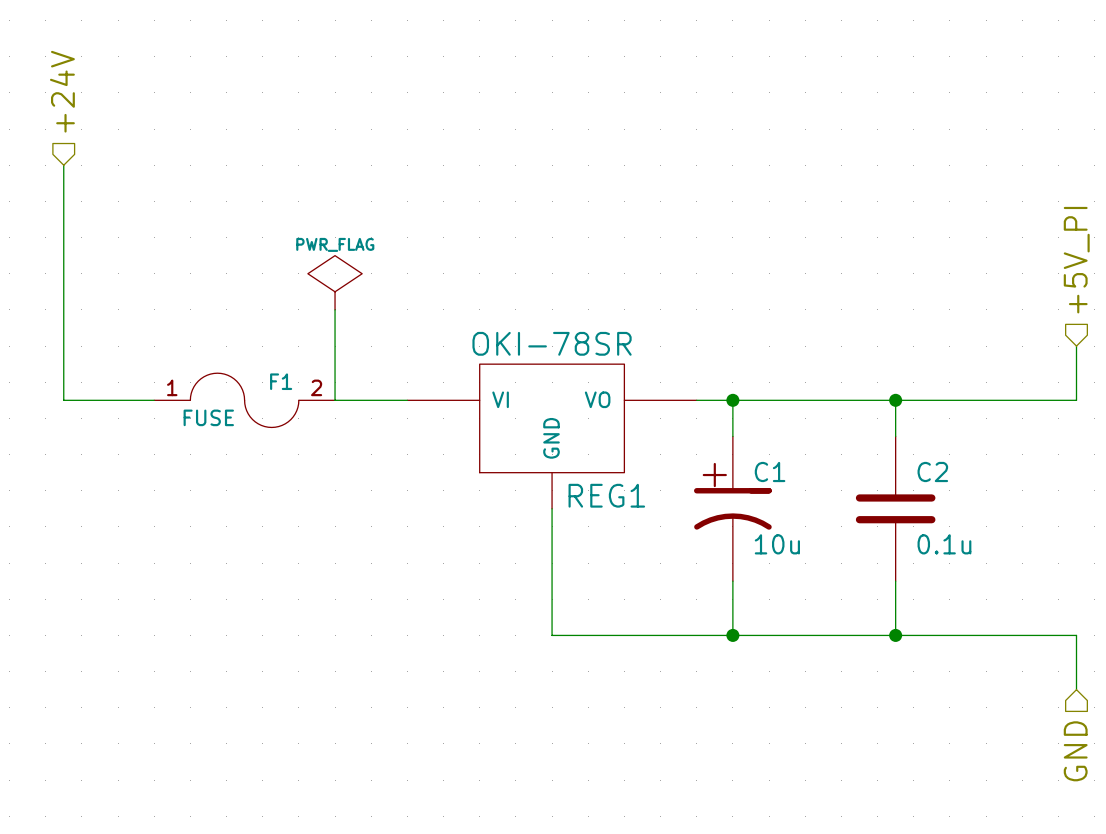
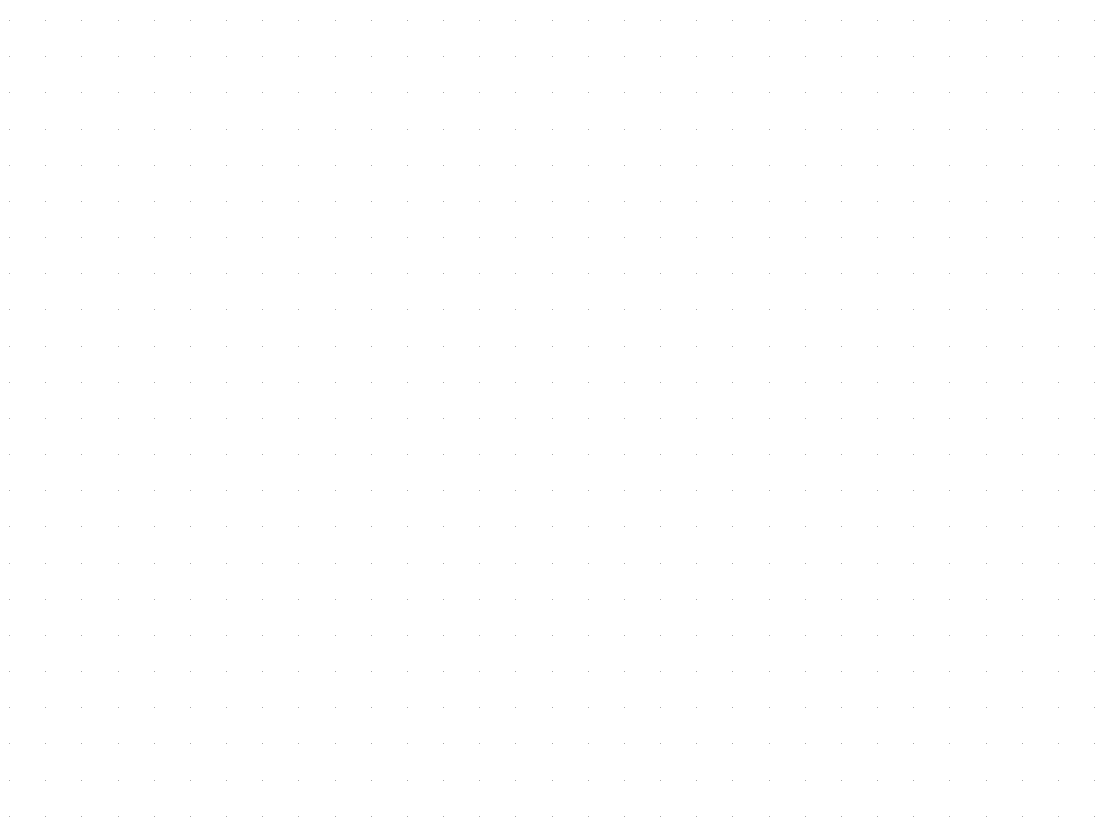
hierarchical label: +24V (62, 91) -> none
wire: (63, 165) (63, 400) (154, 400) -> none
hierarchical label: +5V_PI (1076, 260) -> none
power symbol: PWR_FLAG (335, 282) -> none
wire: (335, 309) (335, 400) (407, 400) -> none
wire: (1076, 346) (1076, 400) (696, 400) -> none
F1: FUSE (244, 400) -> none
wire: (732, 400) (732, 436) -> none
junction: (732, 400) -> none
wire: (895, 400) (895, 436) -> none
junction: (895, 400) -> none
REG1: (552, 436) -> none
wire: (552, 508) (552, 635) (1076, 635) (1076, 689) -> none
C1: 10u (732, 508) -> none
C2: 0.1u (895, 508) -> none
wire: (732, 581) (732, 635) -> none
wire: (895, 581) (895, 635) -> none
junction: (732, 635) -> none
junction: (895, 635) -> none
hierarchical label: GND (1075, 751) -> none

